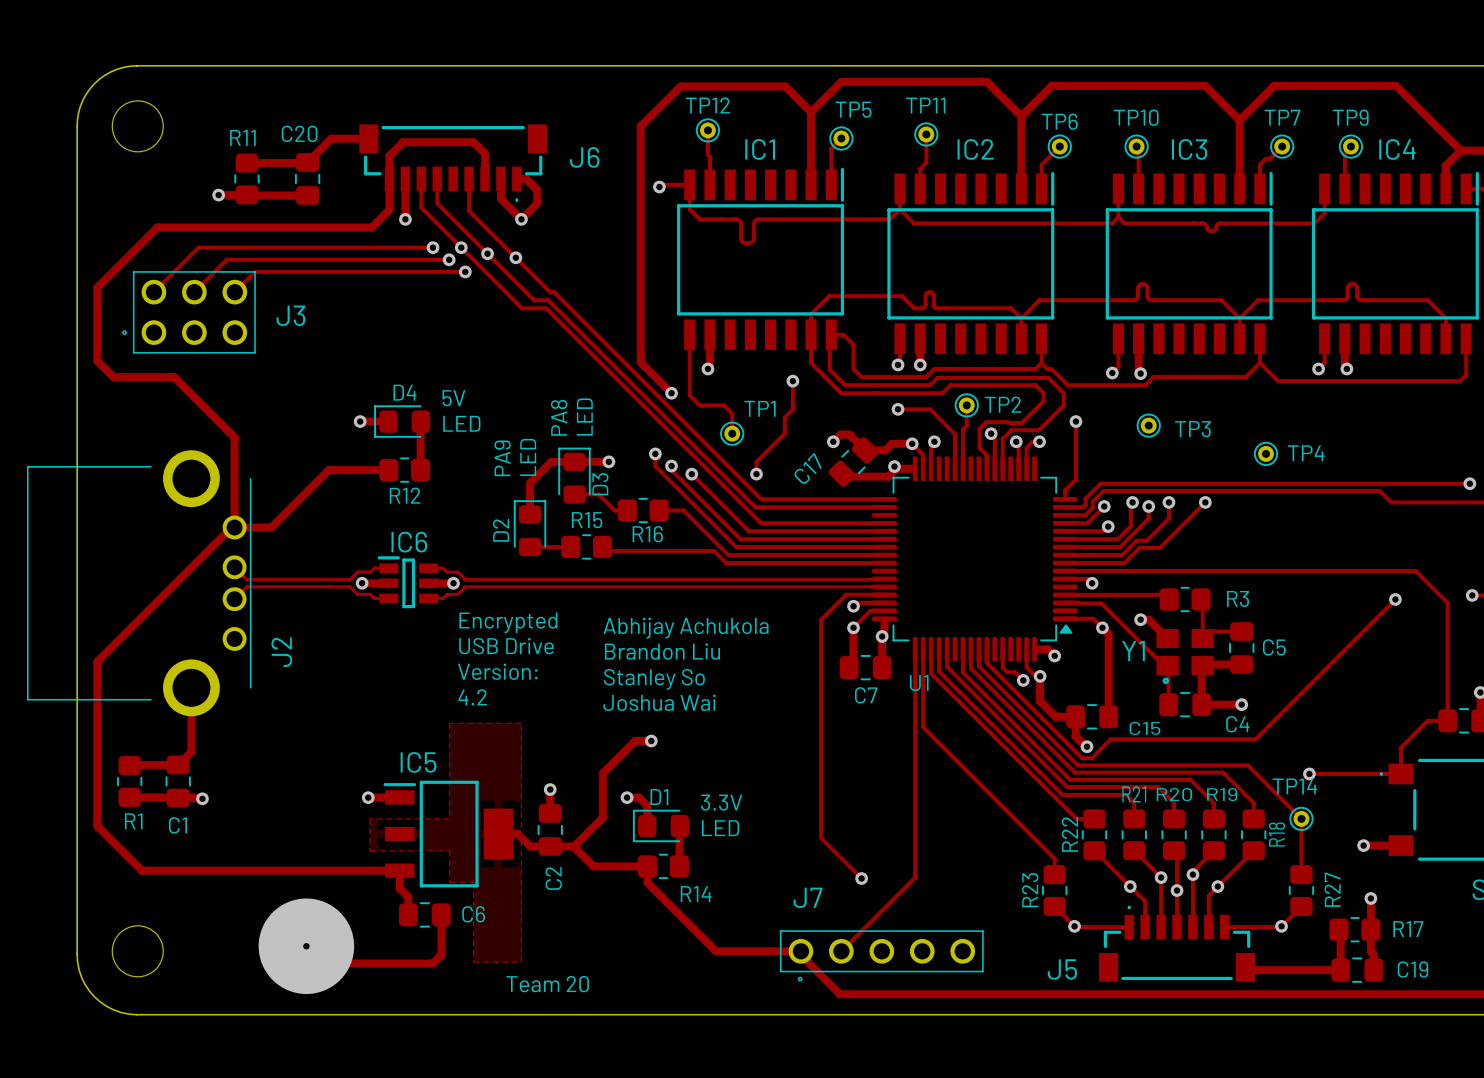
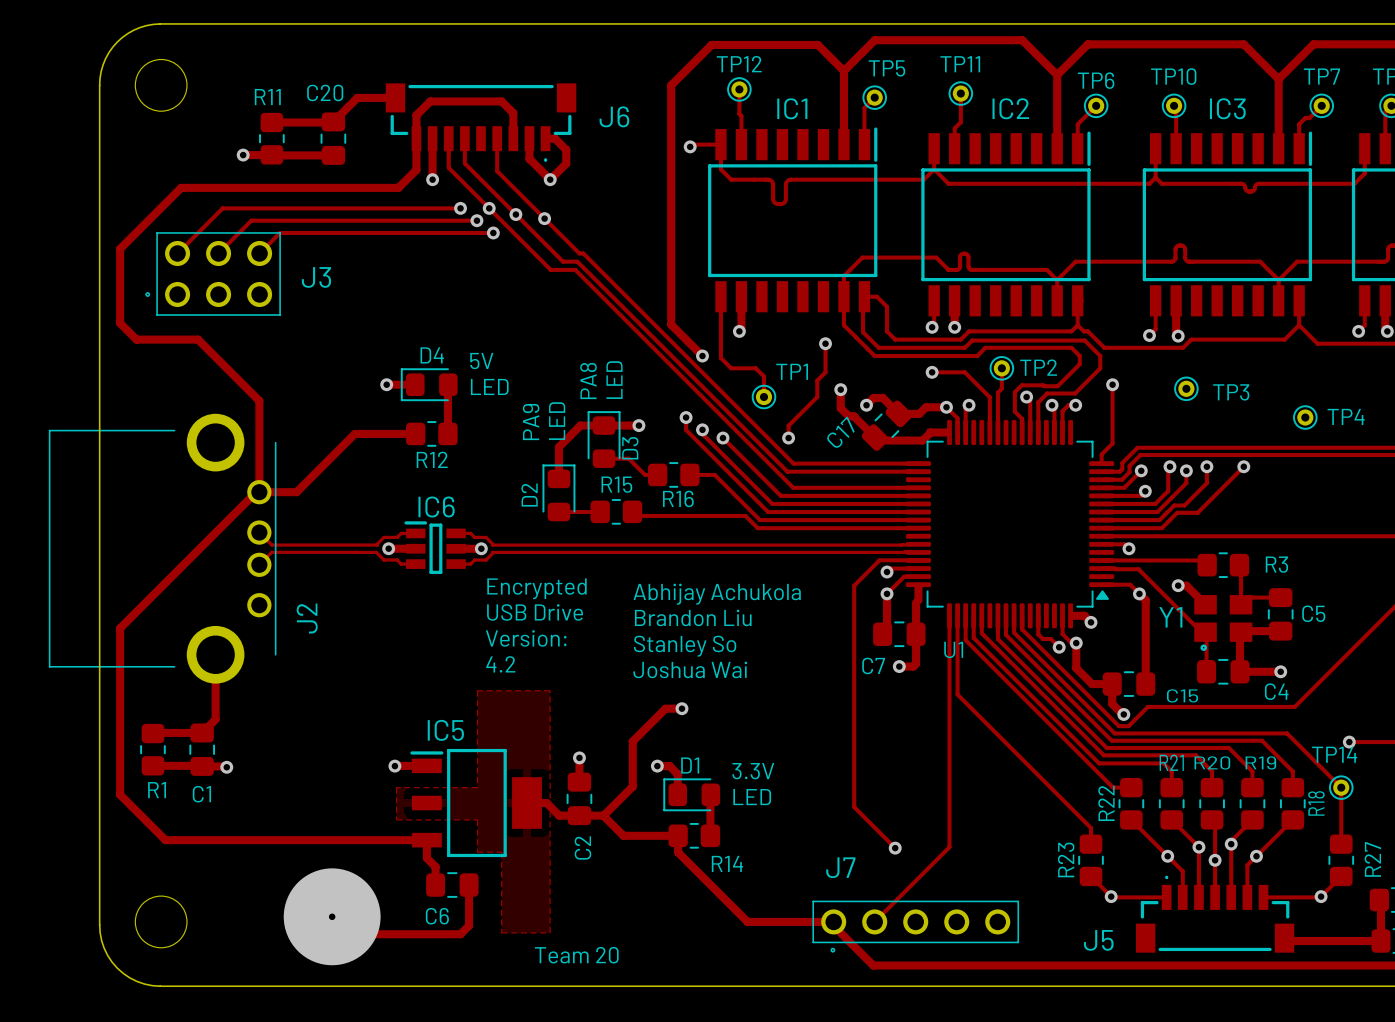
track: none -> (840, 389) (840, 408) (848, 416) (853, 416) (875, 437)
via position: (894, 466) -> (840, 389)
via position: (882, 636) -> (899, 666)
track: none -> (916, 634) (916, 663) (913, 666) (899, 666)
C7 name position: C7 (866, 695) -> C7 (873, 665)
C6 name position: C6 (473, 914) -> C6 (437, 916)

